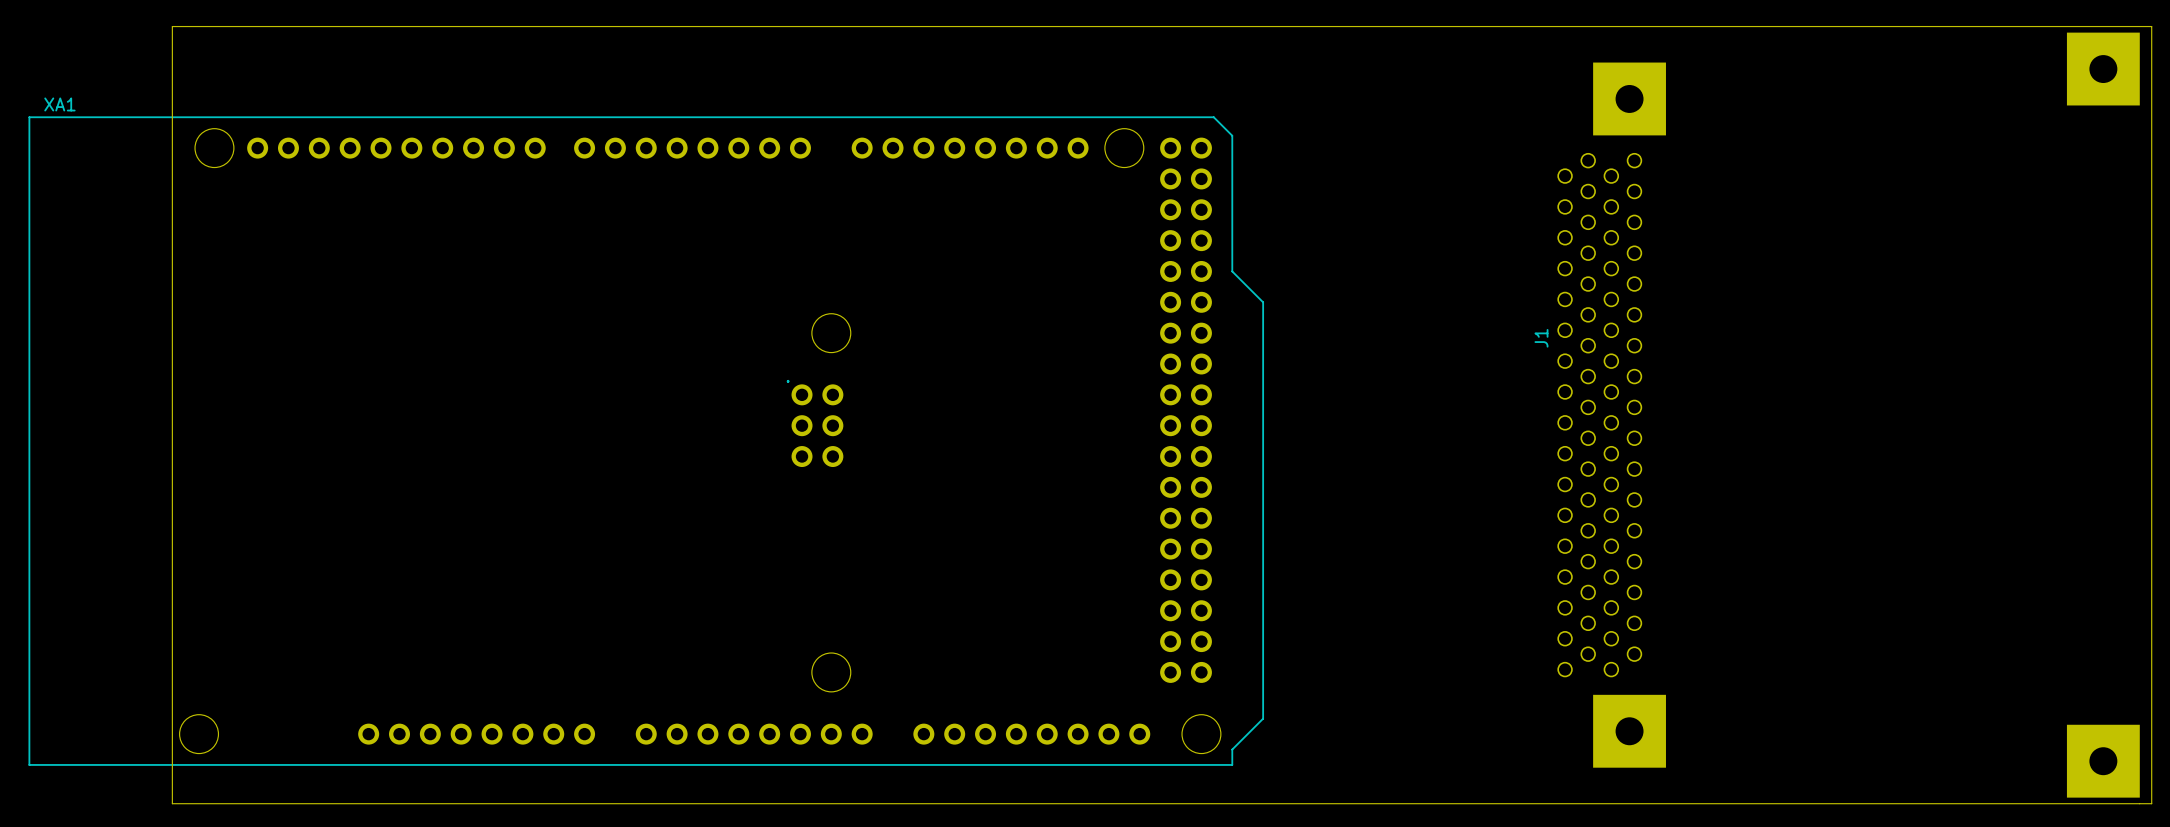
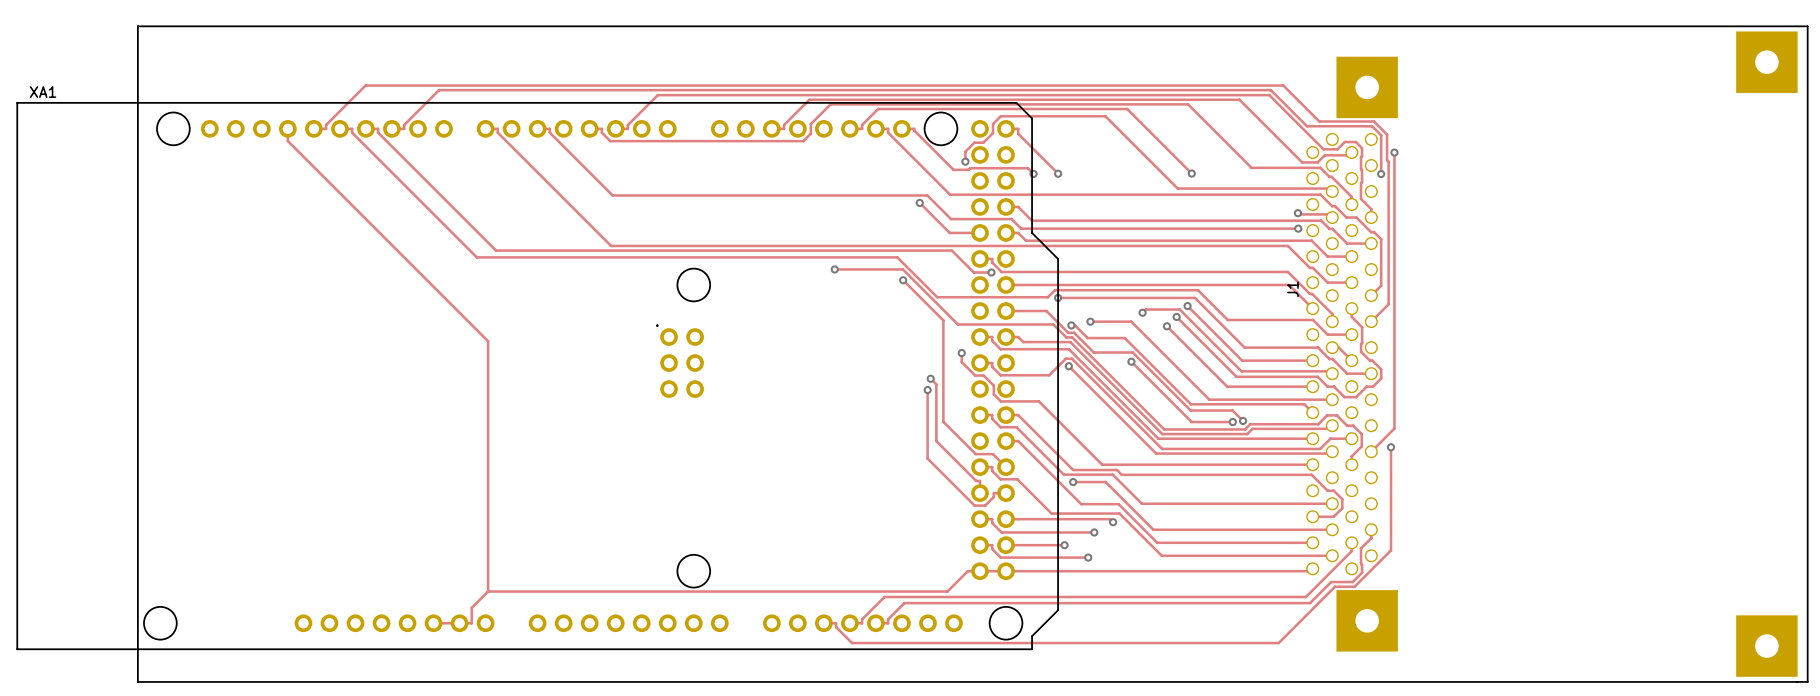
track: none -> (287, 128) (287, 141) (488, 341) (488, 591)
track: none -> (313, 128) (326, 128) (326, 125) (365, 85) (1283, 85) (1319, 121) (1373, 121) (1387, 134) (1388, 304) (1371, 321)
track: none -> (339, 128) (352, 128) (352, 132) (476, 257) (897, 257) (937, 297) (1047, 297) (1054, 290) (1197, 290) (1227, 319) (1312, 319) (1327, 334) (1351, 334)
track: none -> (365, 128) (378, 128) (378, 132) (496, 250) (951, 250) (973, 272) (991, 272)
track: none -> (391, 128) (404, 128) (404, 125) (439, 90) (1270, 90) (1306, 126) (1372, 126) (1381, 135) (1381, 173)
track: none -> (485, 128) (497, 128) (497, 132) (611, 245) (1287, 245) (1327, 282) (1351, 282)
track: none -> (537, 128) (549, 128) (549, 132) (612, 195) (927, 195) (951, 219) (1011, 219) (1021, 228) (1298, 228)
track: none -> (589, 128) (601, 128) (601, 132) (610, 141) (803, 141) (810, 133) (810, 124) (830, 104) (1188, 104) (1251, 167) (1320, 167) (1351, 196) (1351, 204)
track: none -> (615, 128) (627, 128) (627, 125) (657, 95) (1269, 95) (1323, 149) (1337, 149) (1344, 142) (1355, 142) (1362, 148) (1360, 198) (1371, 209) (1371, 217)
track: none -> (771, 128) (784, 128) (784, 125) (809, 99) (1239, 99) (1302, 162) (1317, 162) (1324, 155) (1348, 155) (1351, 152)
track: none -> (849, 128) (862, 128) (862, 125) (878, 109) (1127, 109) (1191, 173)
track: none -> (875, 128) (888, 128) (888, 132) (950, 194) (1320, 194) (1346, 217) (1356, 217) (1381, 239) (1381, 285) (1371, 295)
track: none -> (901, 128) (914, 128) (953, 169) (1027, 168) (1033, 173)
track: none -> (1006, 128) (1018, 128) (1018, 133) (1058, 173)
track: none -> (1394, 152) (1394, 428) (1371, 451)
via: none -> (1394, 152)
track: none -> (965, 161) (965, 151) (974, 142) (983, 142) (993, 133) (993, 124) (1000, 116) (1105, 116) (1177, 188) (1329, 188) (1332, 191)
via: none -> (965, 161)
via: none -> (1033, 173)
via: none -> (1058, 173)
via: none -> (1191, 173)
via: none -> (1381, 174)
track: none -> (919, 202) (949, 232) (980, 232)
via: none -> (919, 202)
track: none -> (1006, 206) (1018, 206) (1031, 220) (1321, 220) (1347, 243) (1371, 243)
track: none -> (1297, 213) (1329, 214) (1332, 217)
via: none -> (1297, 213)
via: none -> (1298, 228)
track: none -> (1006, 232) (1018, 232) (1025, 240) (1311, 240) (1327, 256) (1351, 256)
track: none -> (980, 258) (992, 258) (992, 262) (1001, 271) (1287, 271) (1332, 314) (1332, 321)
track: none -> (834, 269) (902, 269) (957, 324) (1053, 324) (1066, 337) (1072, 337) (1164, 429) (1245, 429) (1250, 424) (1318, 424) (1327, 415) (1336, 415) (1347, 425) (1353, 425) (1361, 434) (1361, 446) (1351, 456) (1351, 464)
via: none -> (834, 269)
via: none -> (991, 272)
track: none -> (903, 280) (943, 320) (943, 421) (975, 454) (993, 454) (1006, 467)
via: none -> (903, 280)
track: none -> (1006, 284) (1289, 284) (1312, 308)
track: none -> (1058, 297) (1195, 297) (1244, 347) (1318, 347) (1347, 373) (1371, 373)
via: none -> (1058, 297)
track: none -> (1187, 306) (1242, 360) (1312, 360)
via: none -> (1187, 306)
track: none -> (1351, 308) (1351, 316) (1362, 327) (1361, 351) (1381, 369) (1381, 378) (1373, 386) (1366, 386) (1356, 397) (1344, 397) (1334, 386) (1327, 386) (1317, 376) (1236, 376) (1176, 316)
track: none -> (1006, 311) (1046, 311) (1068, 332) (1074, 332) (1093, 352) (1132, 352) (1190, 410) (1232, 410) (1243, 420)
track: none -> (1142, 312) (1145, 309) (1179, 309) (1241, 371) (1329, 371) (1332, 373)
via: none -> (1142, 312)
via: none -> (1176, 316)
track: none -> (1090, 321) (1131, 321) (1209, 399) (1332, 399)
via: none -> (1090, 321)
track: none -> (1071, 325) (1074, 325) (1087, 338) (1124, 338) (1191, 404) (1304, 404) (1312, 412)
via: none -> (1071, 325)
track: none -> (1166, 326) (1227, 386) (1312, 386)
via: none -> (1166, 326)
track: none -> (980, 337) (992, 337) (992, 340) (1000, 349) (1068, 349) (1158, 438) (1312, 438)
track: none -> (1006, 337) (1018, 337) (1023, 342) (1070, 342) (1162, 434) (1247, 434) (1252, 428) (1329, 428) (1332, 425)
track: none -> (1332, 347) (1338, 347) (1351, 360)
track: none -> (961, 353) (961, 362) (975, 375) (983, 375) (993, 385) (993, 394) (1000, 401) (1038, 401) (1102, 464) (1312, 464)
via: none -> (961, 353)
track: none -> (1131, 361) (1191, 422) (1232, 422)
via: none -> (1131, 361)
track: none -> (980, 363) (992, 363) (992, 366) (1000, 375) (1049, 375) (1065, 358) (1071, 358) (1162, 448) (1320, 448) (1330, 438) (1351, 438)
track: none -> (1068, 366) (1156, 453) (1330, 453) (1332, 451)
via: none -> (1068, 366)
track: none -> (930, 378) (936, 384) (936, 441) (976, 480) (980, 480) (980, 493)
via: none -> (930, 378)
track: none -> (927, 390) (927, 458) (974, 505) (985, 505) (993, 496) (993, 493) (1006, 493)
via: none -> (927, 390)
track: none -> (980, 415) (992, 415) (992, 418) (1000, 427) (1016, 427) (1063, 474) (1112, 474) (1141, 503) (1332, 503)
track: none -> (1006, 415) (1018, 415) (1073, 470) (1117, 470) (1121, 474) (1311, 474) (1327, 490) (1333, 490) (1342, 499) (1342, 508) (1333, 516) (1312, 516)
via: none -> (1243, 420)
via: none -> (1232, 422)
track: none -> (1006, 441) (1018, 441) (1081, 504) (1118, 504) (1157, 542) (1312, 542)
track: none -> (1391, 447) (1391, 550) (1354, 586) (1335, 586) (1278, 643) (852, 643) (836, 627) (836, 623) (823, 623)
via: none -> (1391, 447)
track: none -> (980, 467) (992, 467) (992, 470) (1000, 479) (1017, 479) (1051, 513) (1119, 513) (1161, 555) (1332, 555)
track: none -> (1073, 482) (1105, 482) (1153, 529) (1332, 529)
via: none -> (1073, 482)
track: none -> (980, 519) (992, 519) (992, 522) (1001, 532) (1094, 532)
track: none -> (1006, 519) (1110, 519) (1113, 522)
via: none -> (1113, 522)
track: none -> (1371, 529) (1371, 538) (1361, 548) (1362, 572) (1352, 582) (1331, 582) (1310, 603) (904, 603) (888, 619) (888, 623) (875, 623)
via: none -> (1094, 532)
track: none -> (1351, 542) (1351, 551) (1305, 597) (884, 597) (862, 619) (862, 623) (849, 623)
track: none -> (980, 545) (992, 545) (992, 548) (1000, 557) (1088, 557)
track: none -> (1006, 545) (1064, 545)
via: none -> (1064, 545)
via: none -> (1088, 557)
track: none -> (1312, 568) (1310, 571) (967, 571) (947, 591) (488, 591)
track: none -> (488, 591) (471, 607) (471, 623) (433, 623)

